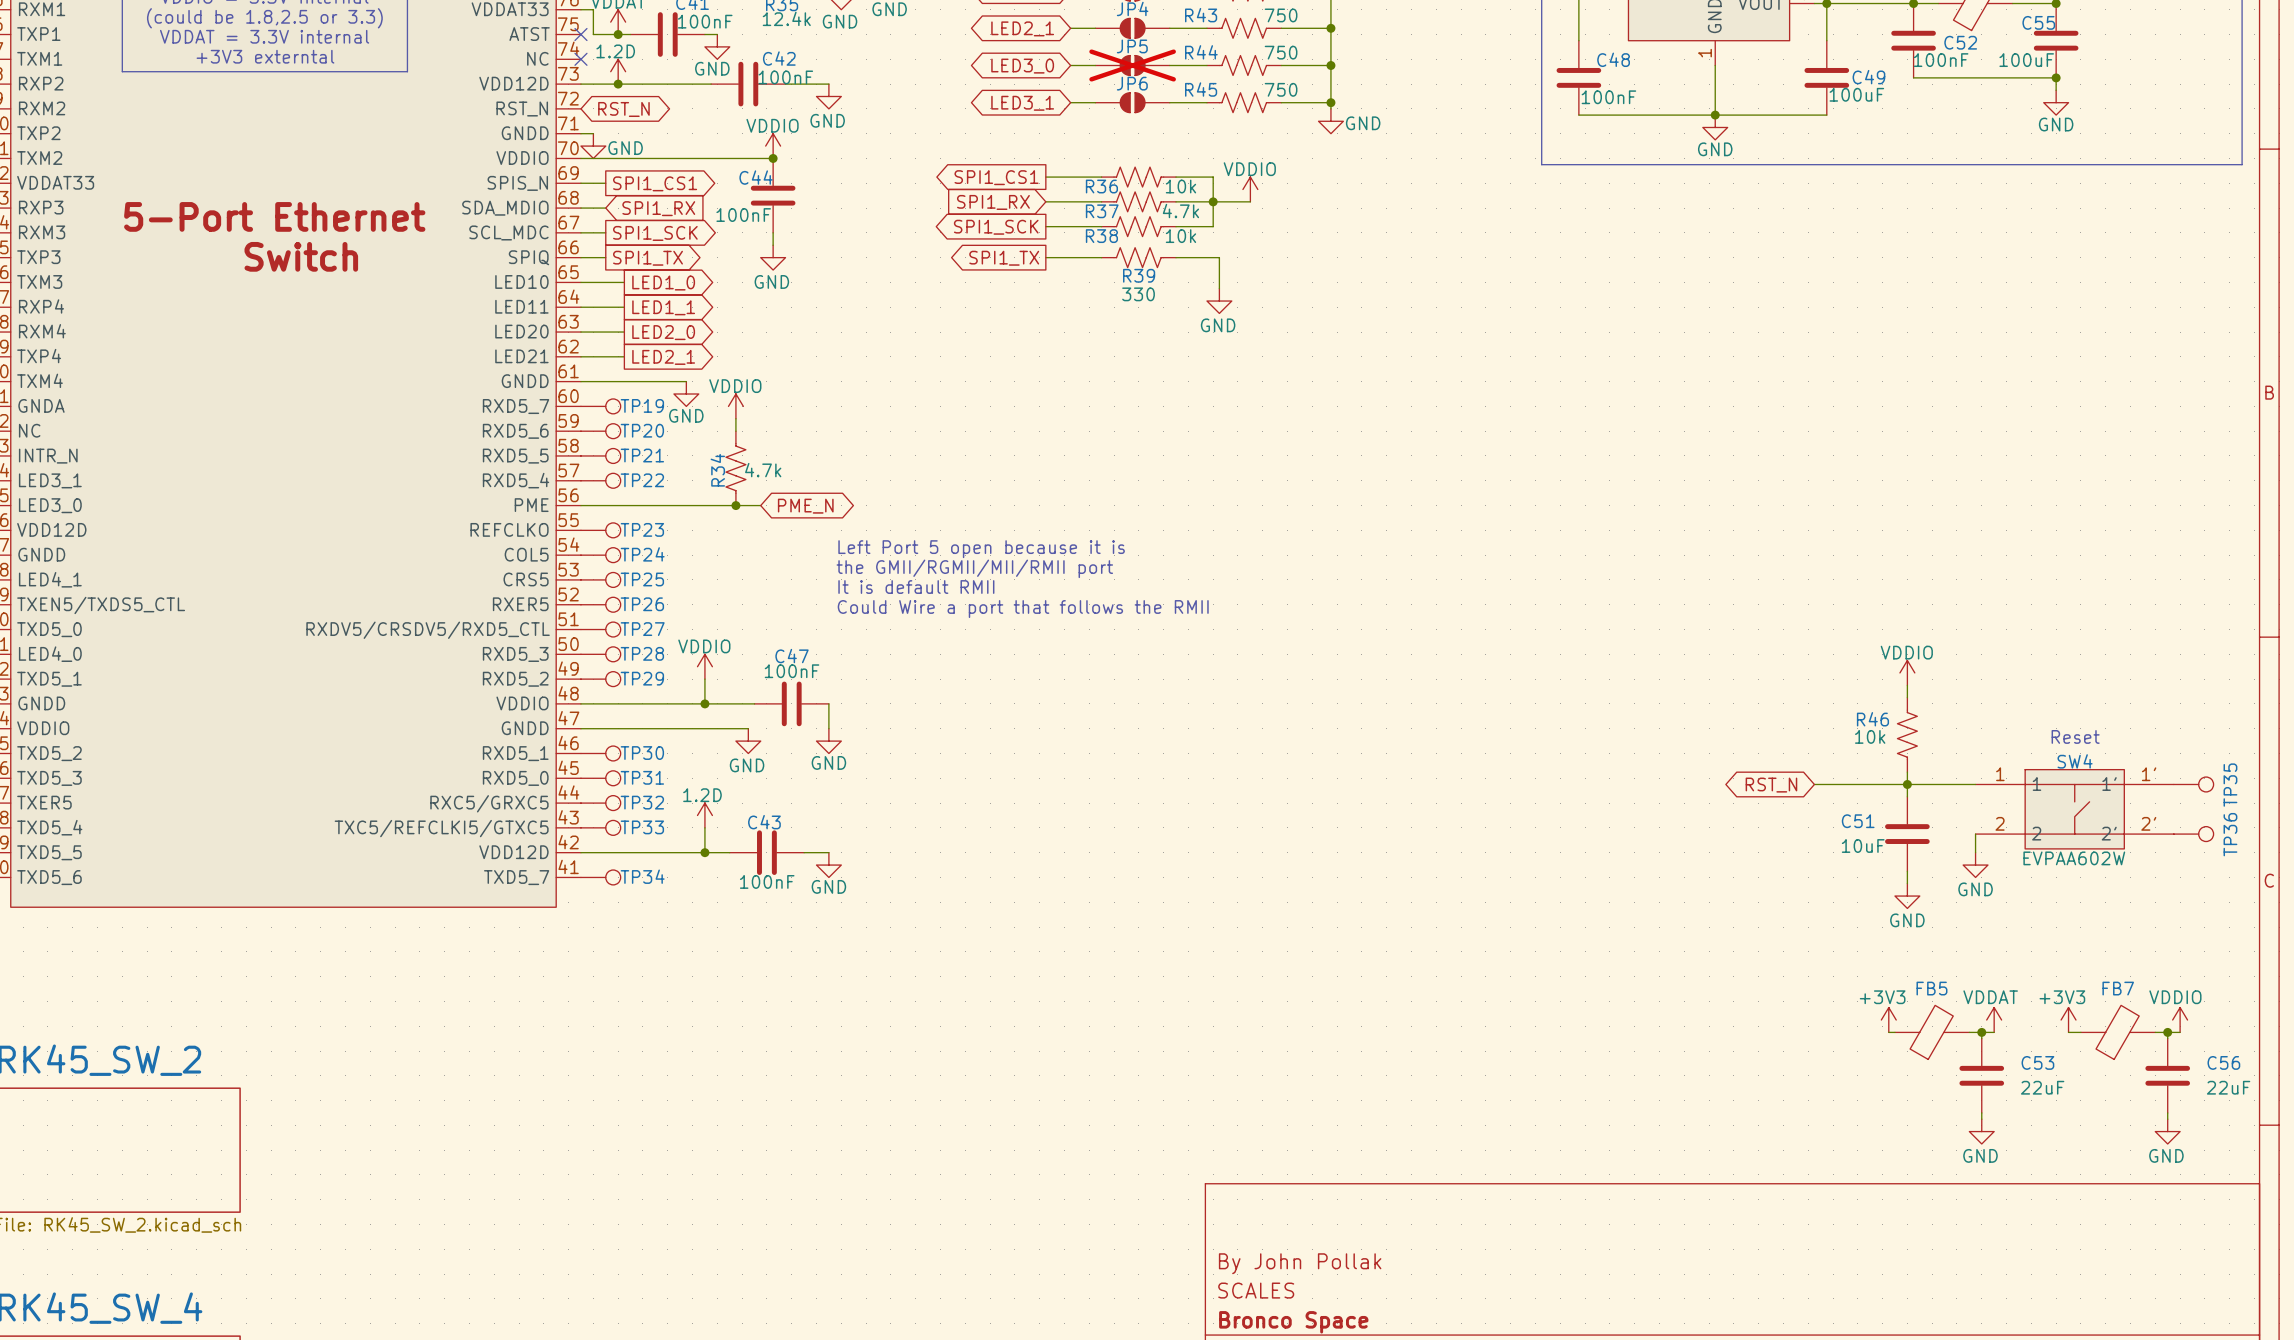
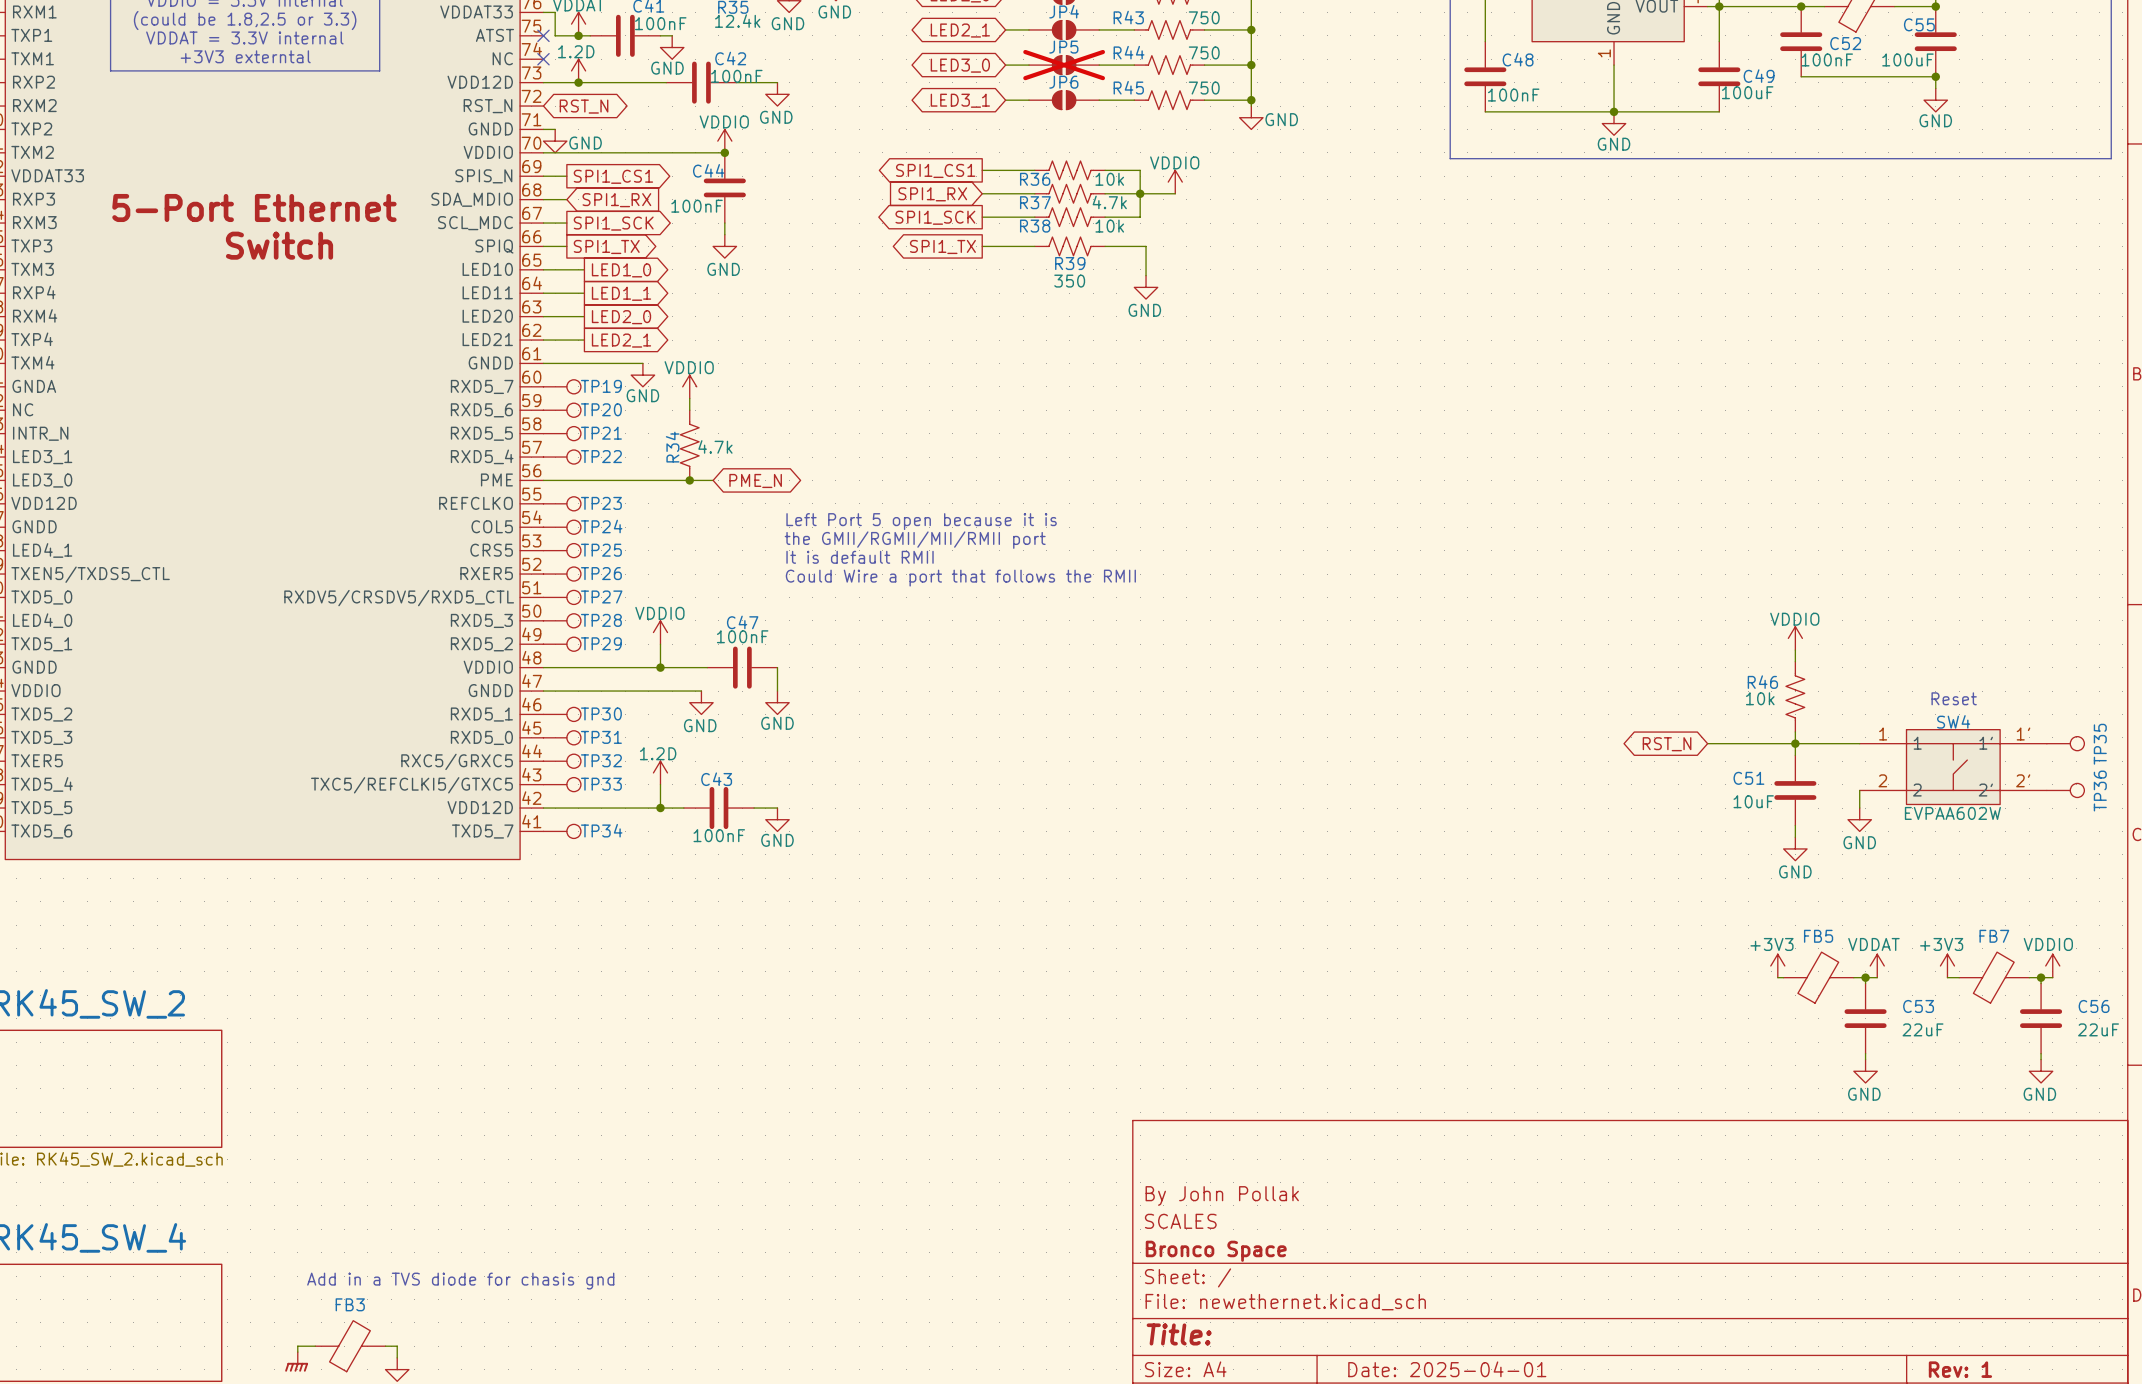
R39 value: 330 (1138, 294) -> 350 (1069, 281)

